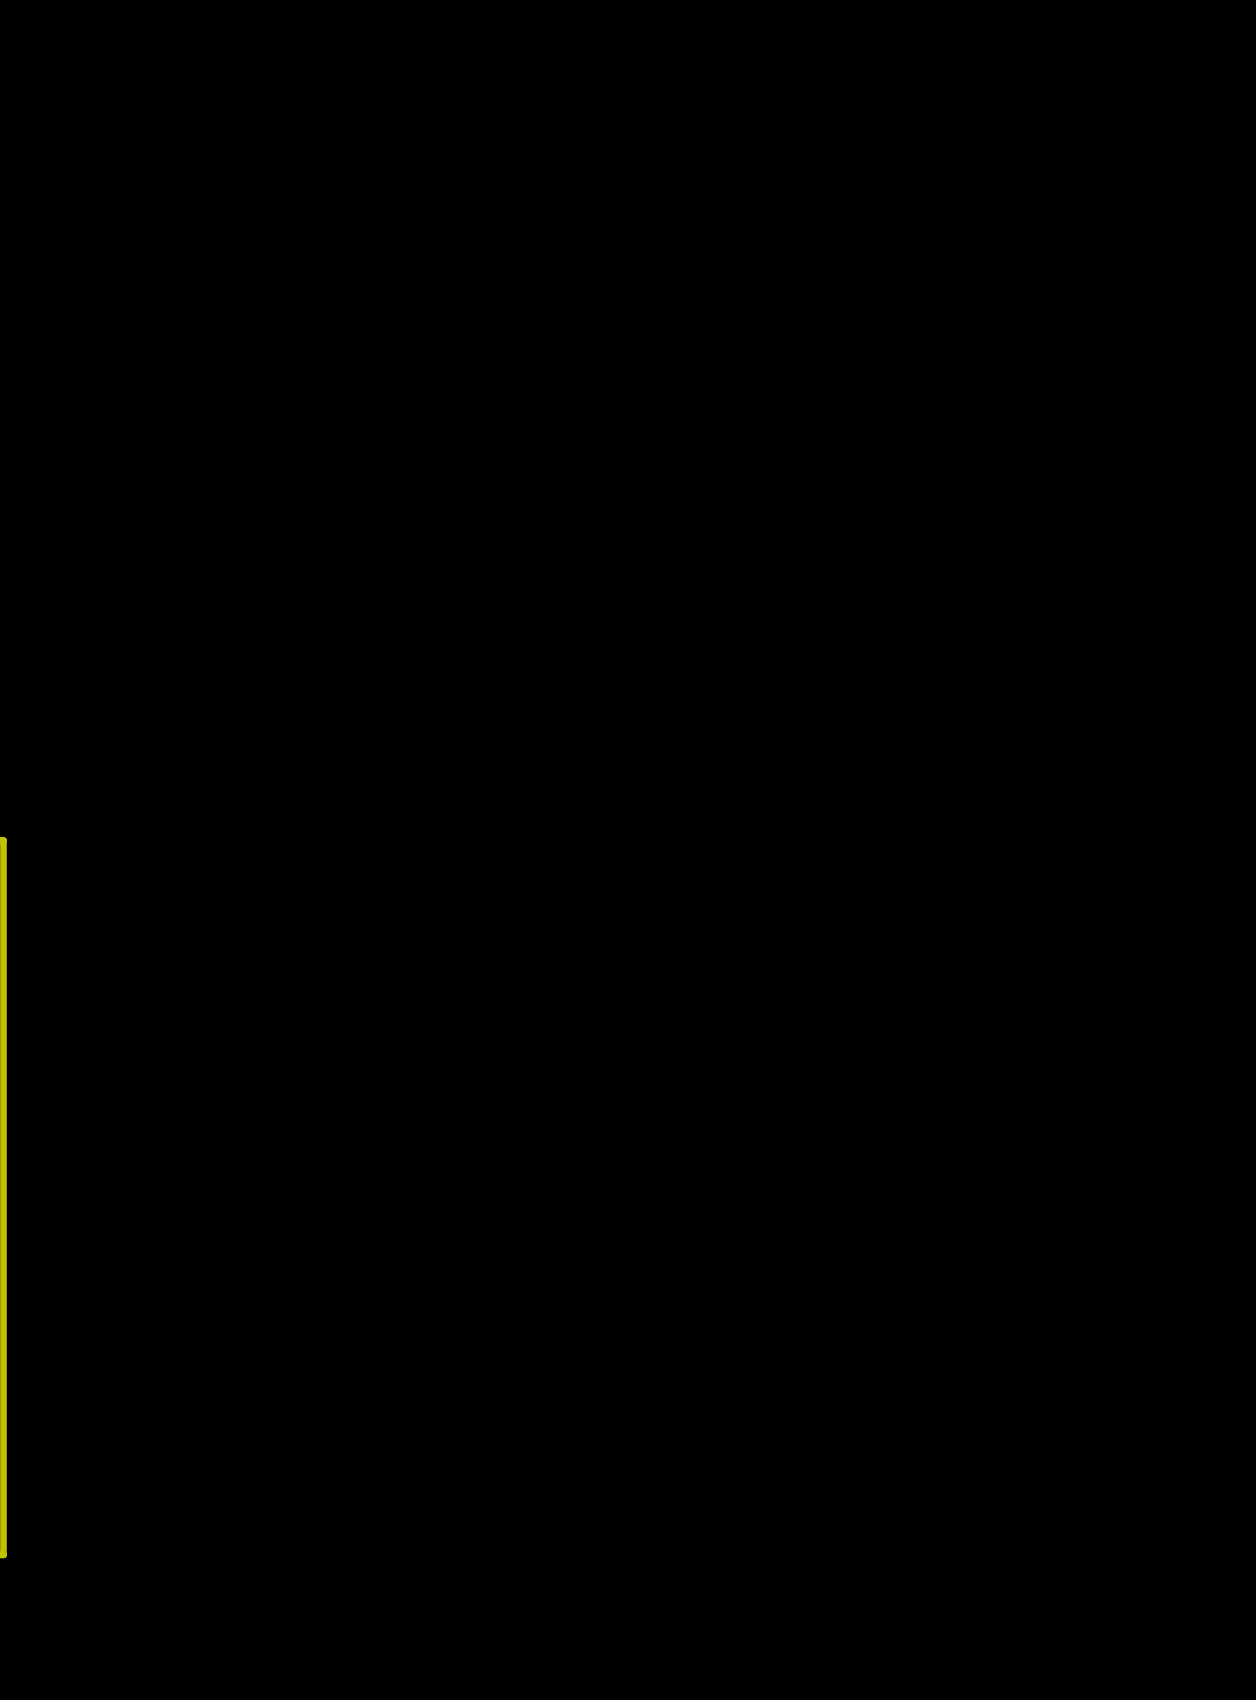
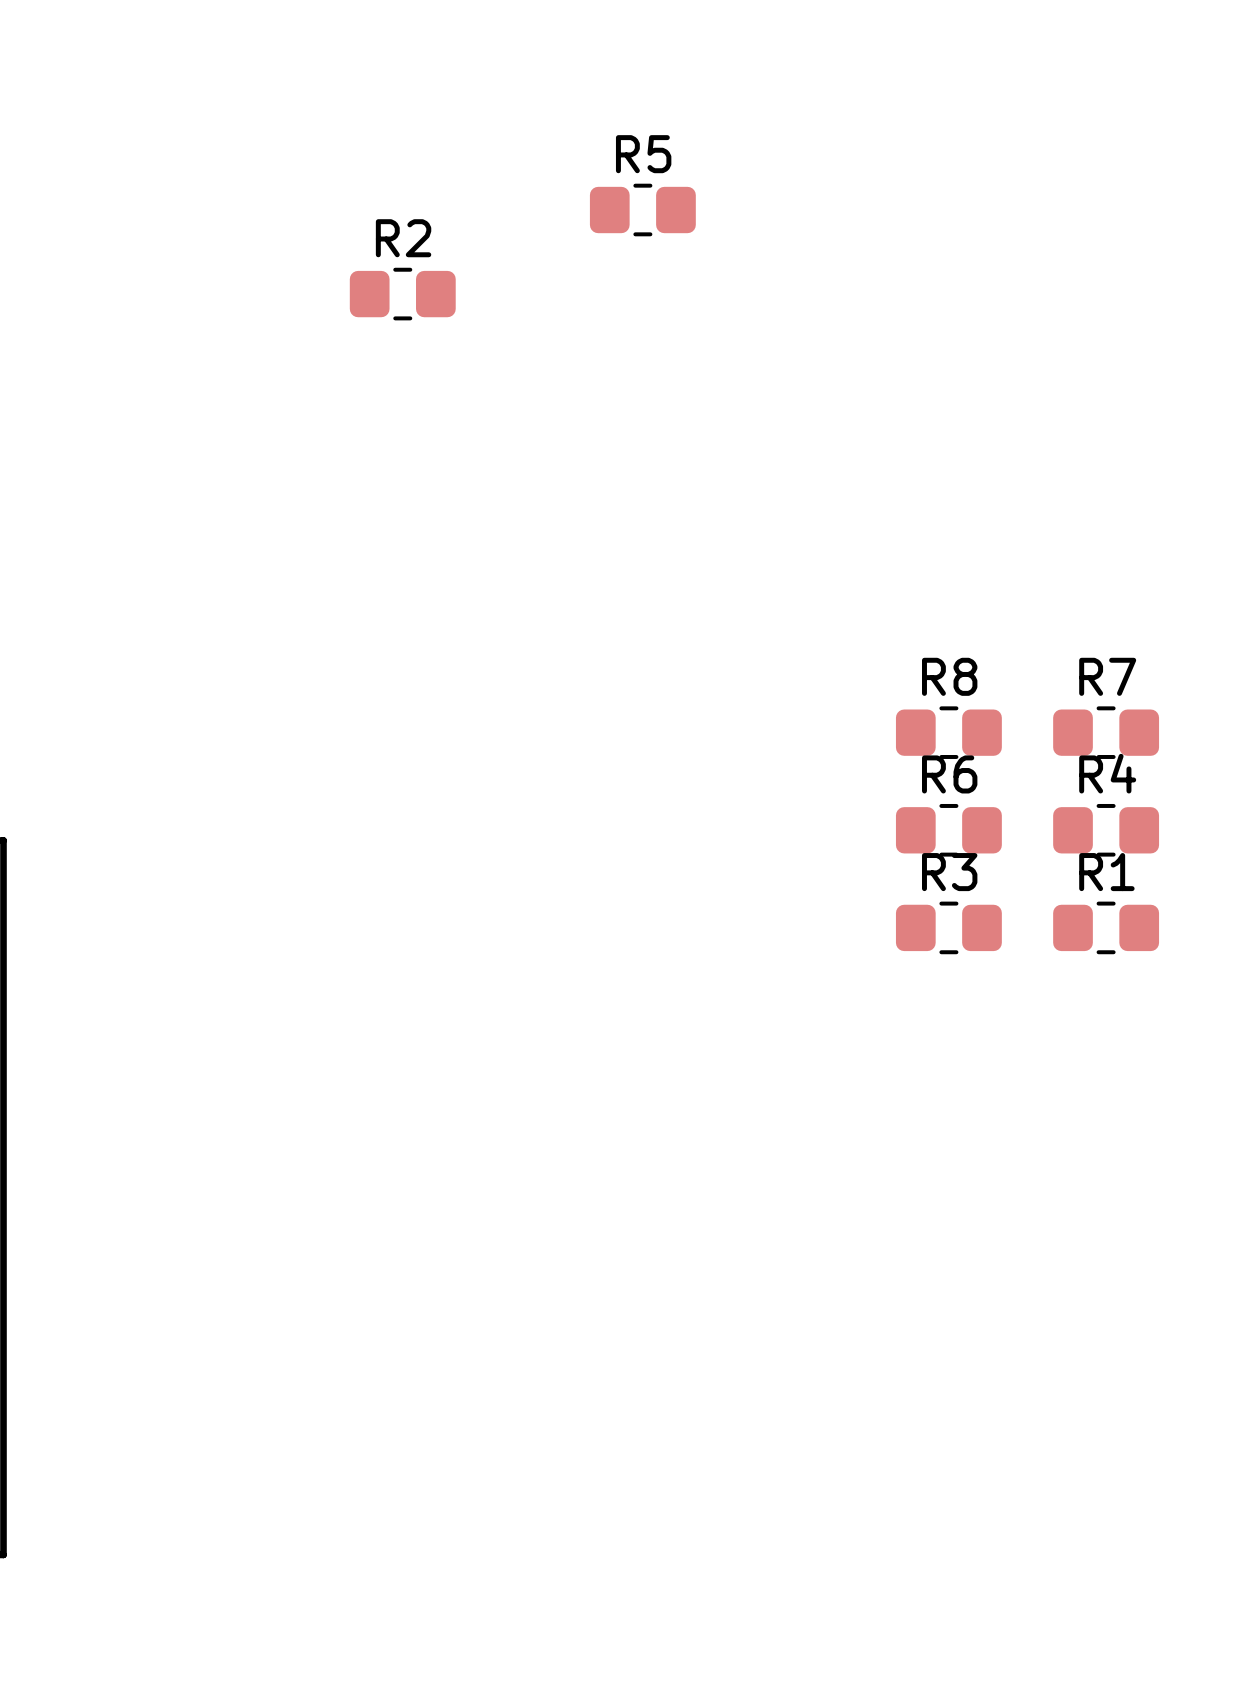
R5: none -> (642, 210)
R2: none -> (402, 294)
R8: none -> (948, 732)
R7: none -> (1106, 732)
R6: none -> (948, 830)
R4: none -> (1106, 830)
R3: none -> (948, 927)
R1: none -> (1106, 927)

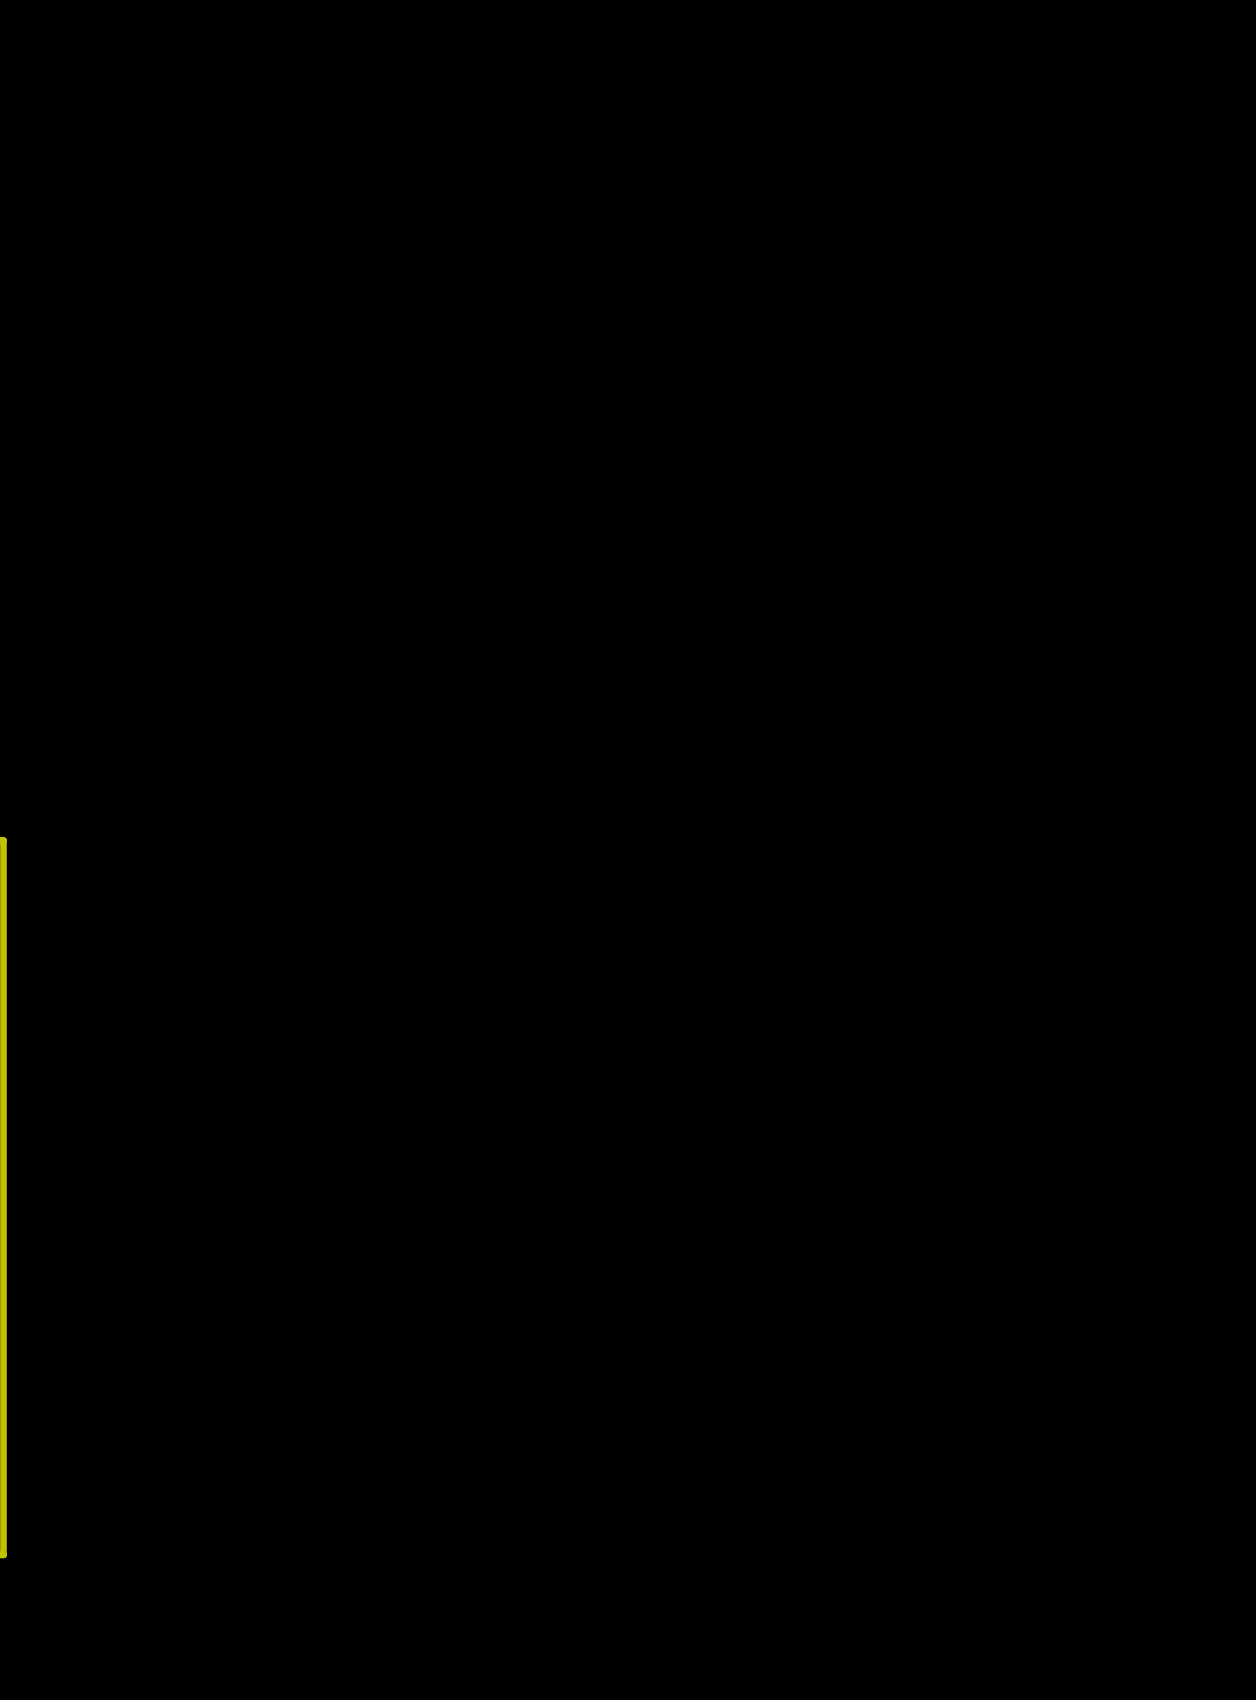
R5: (642, 210) -> none
R2: (402, 294) -> none
R8: (948, 732) -> none
R7: (1106, 732) -> none
R6: (948, 830) -> none
R4: (1106, 830) -> none
R3: (948, 927) -> none
R1: (1106, 927) -> none

